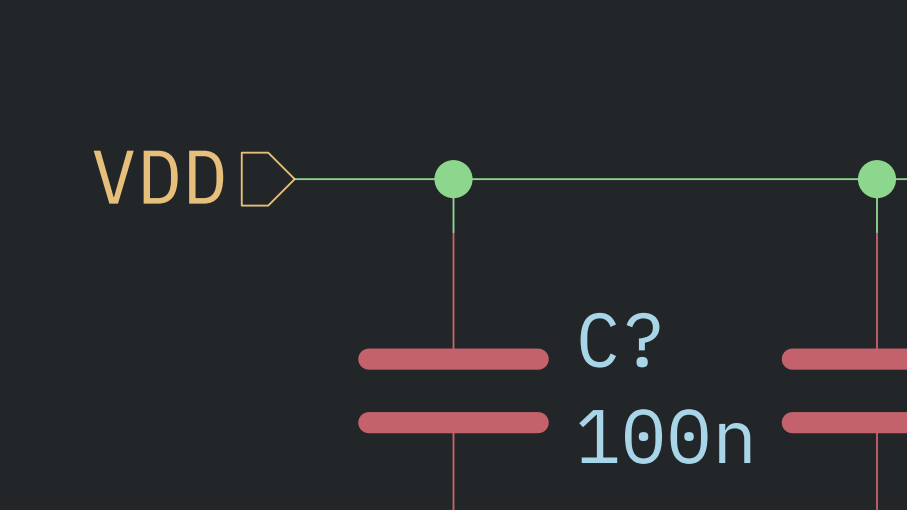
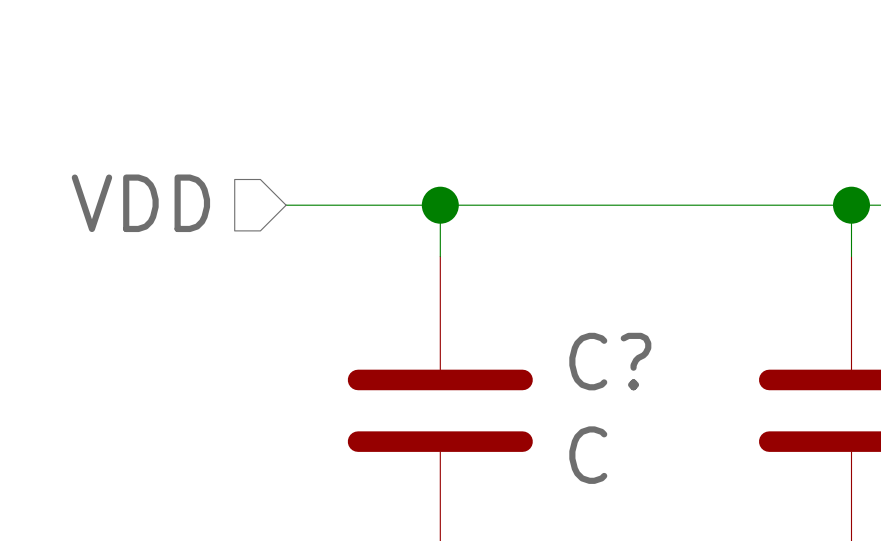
C? value: 100n (664, 436) -> C (588, 455)

